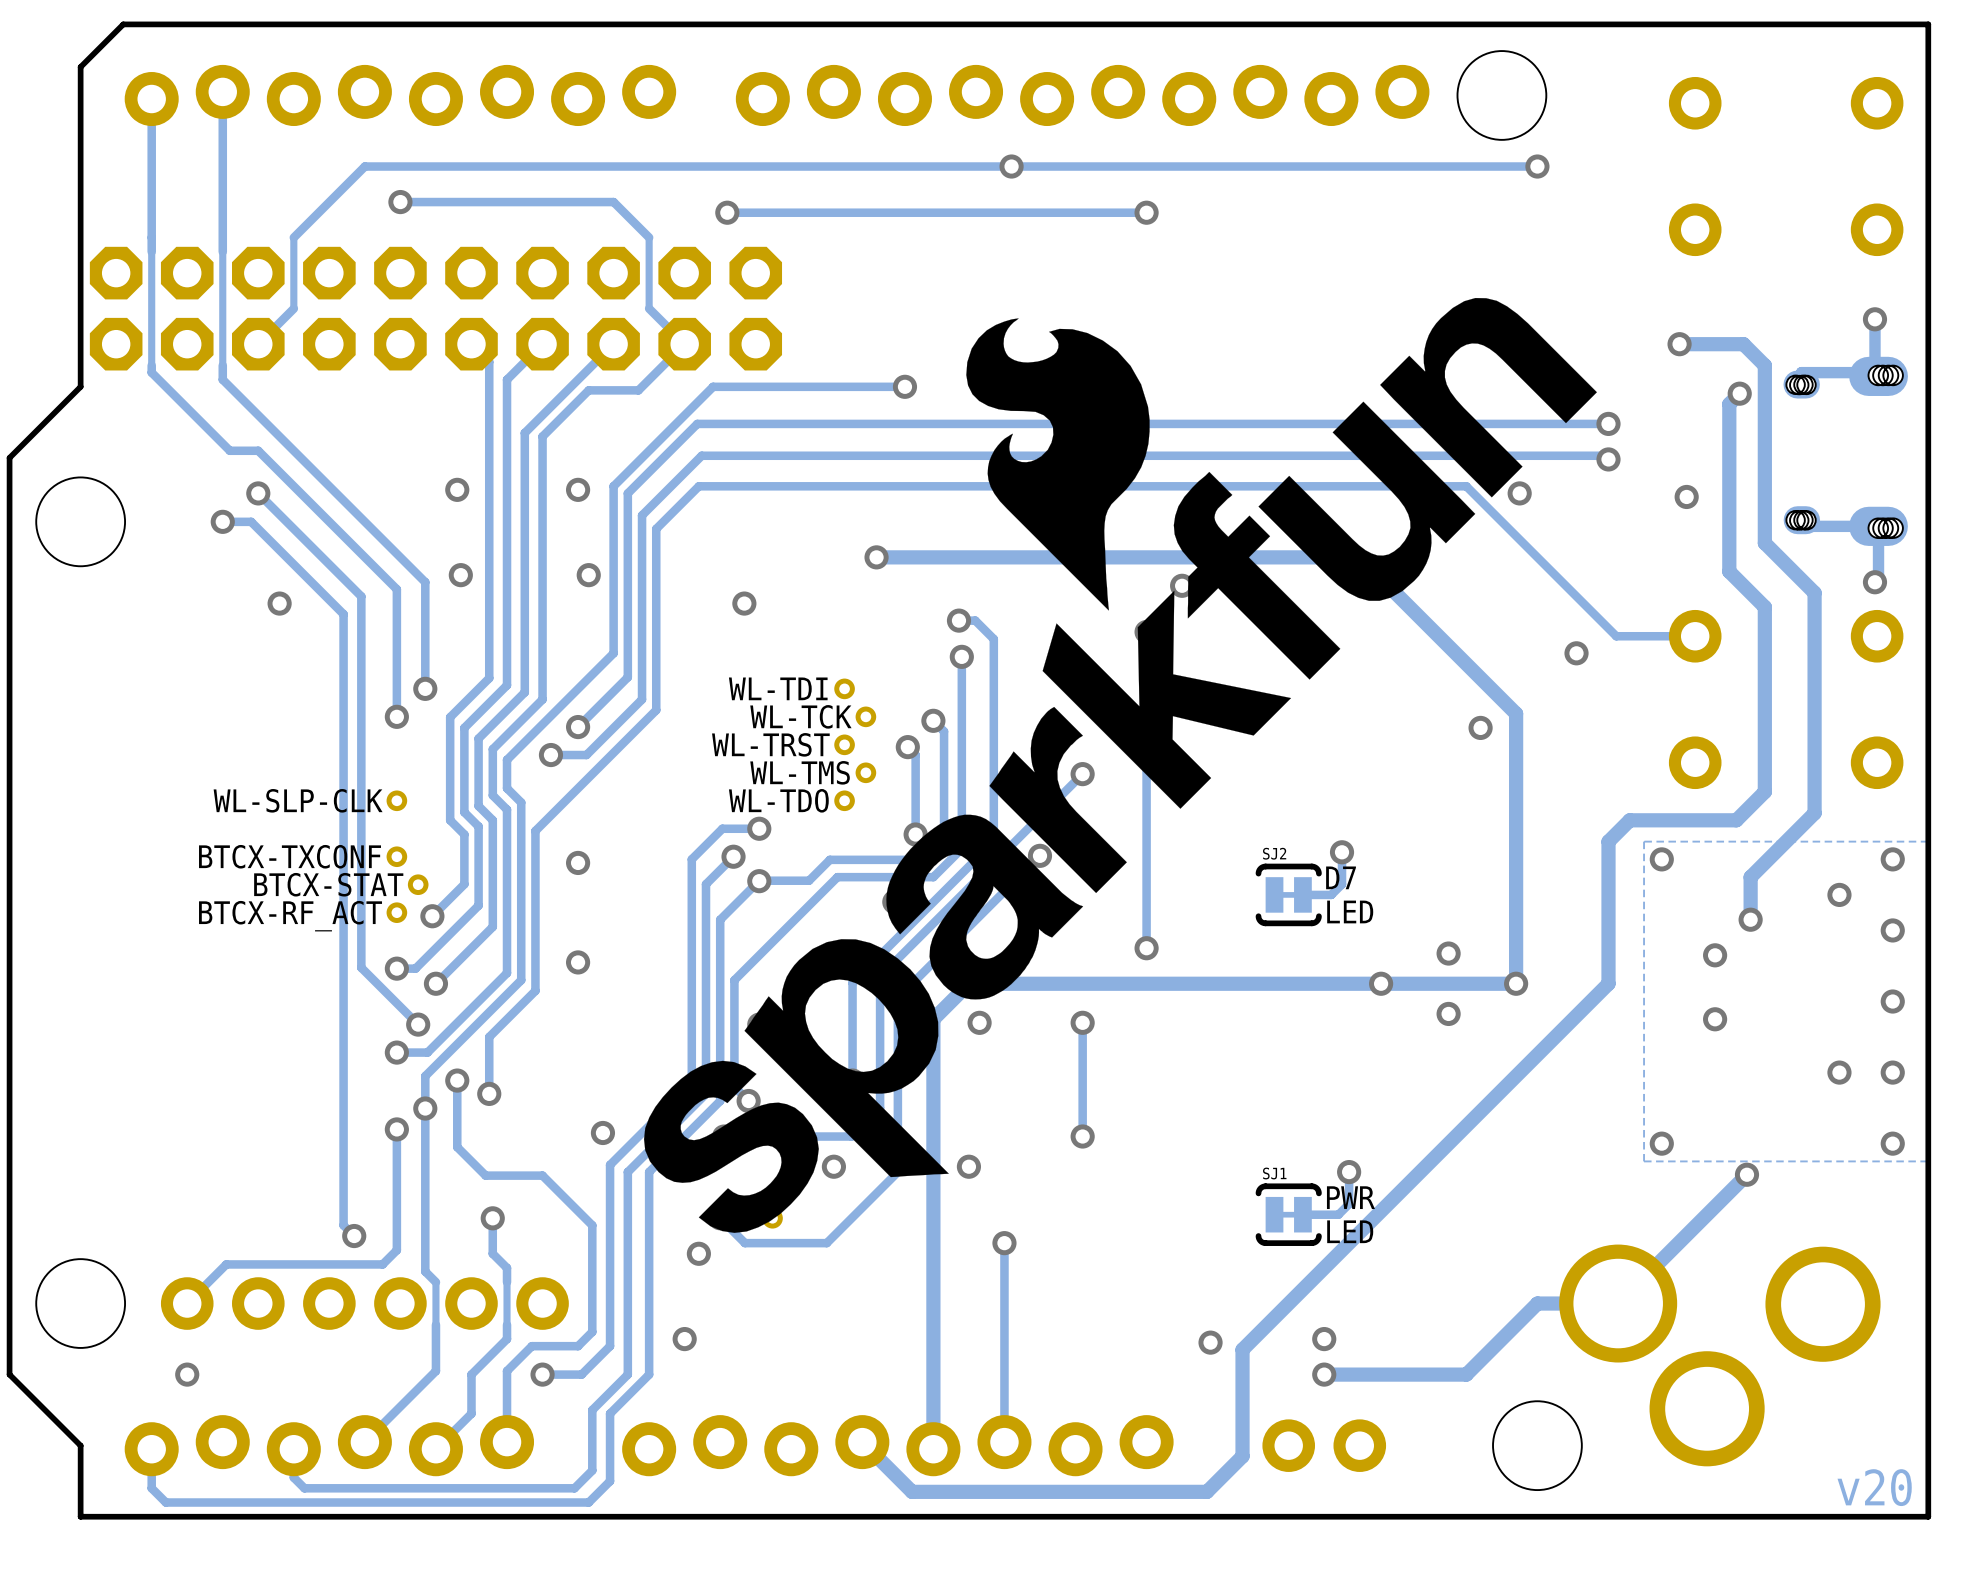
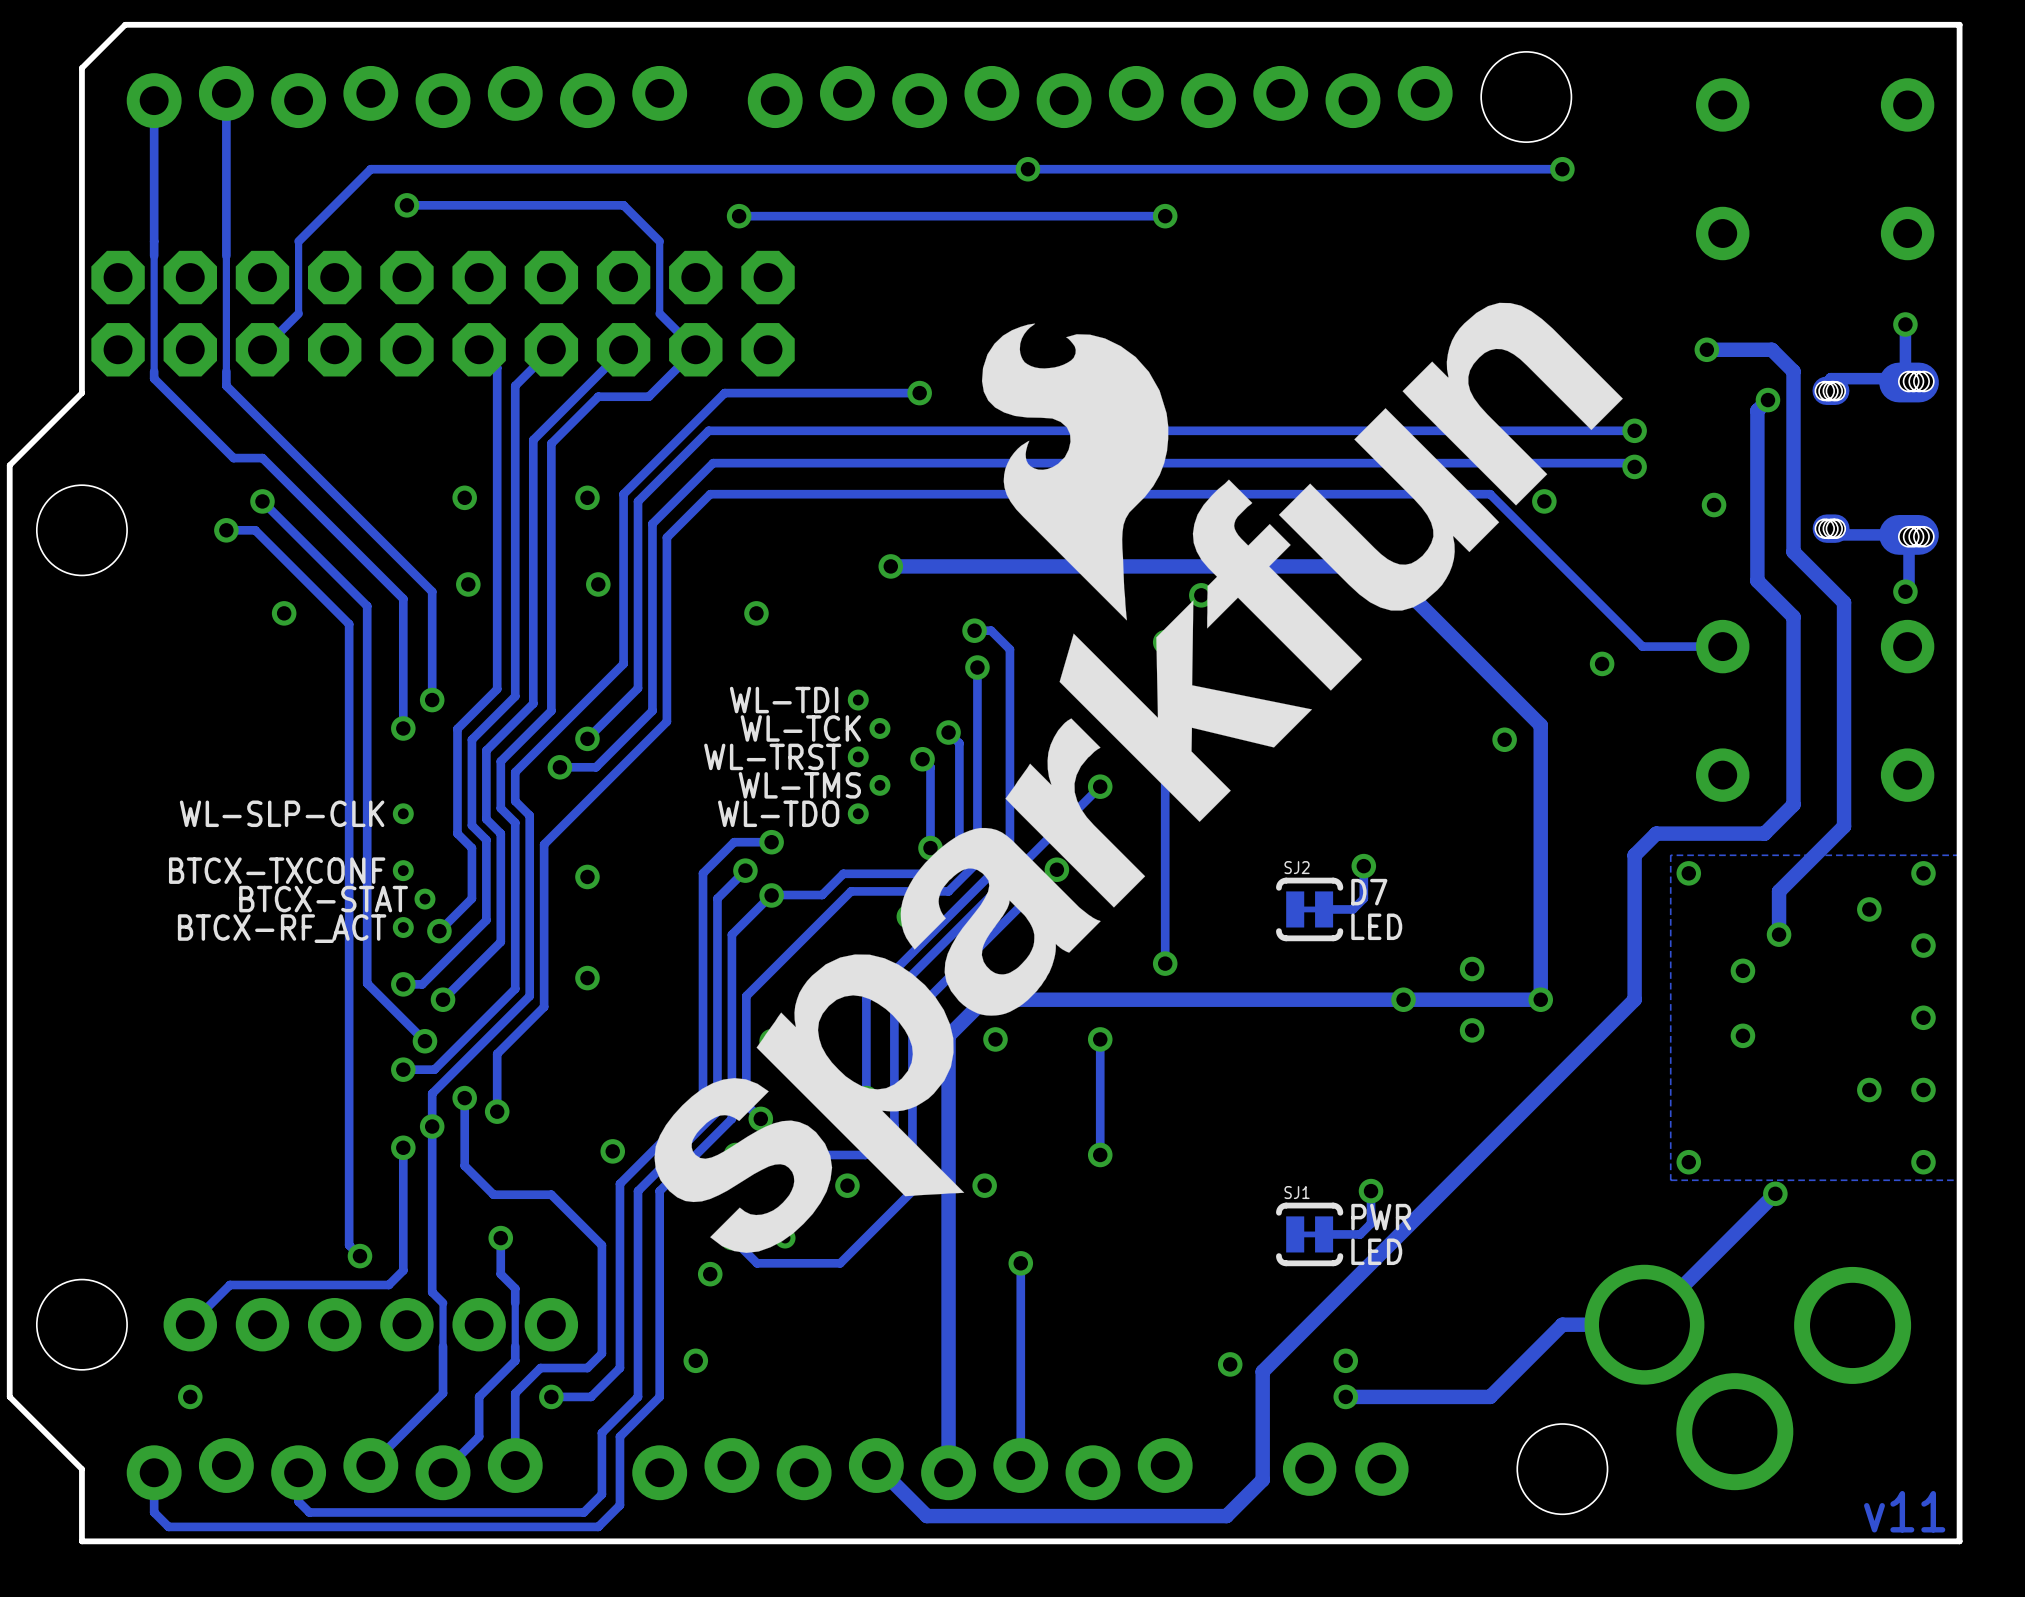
text: v20 (1874, 1487) -> v11 (1904, 1511)

